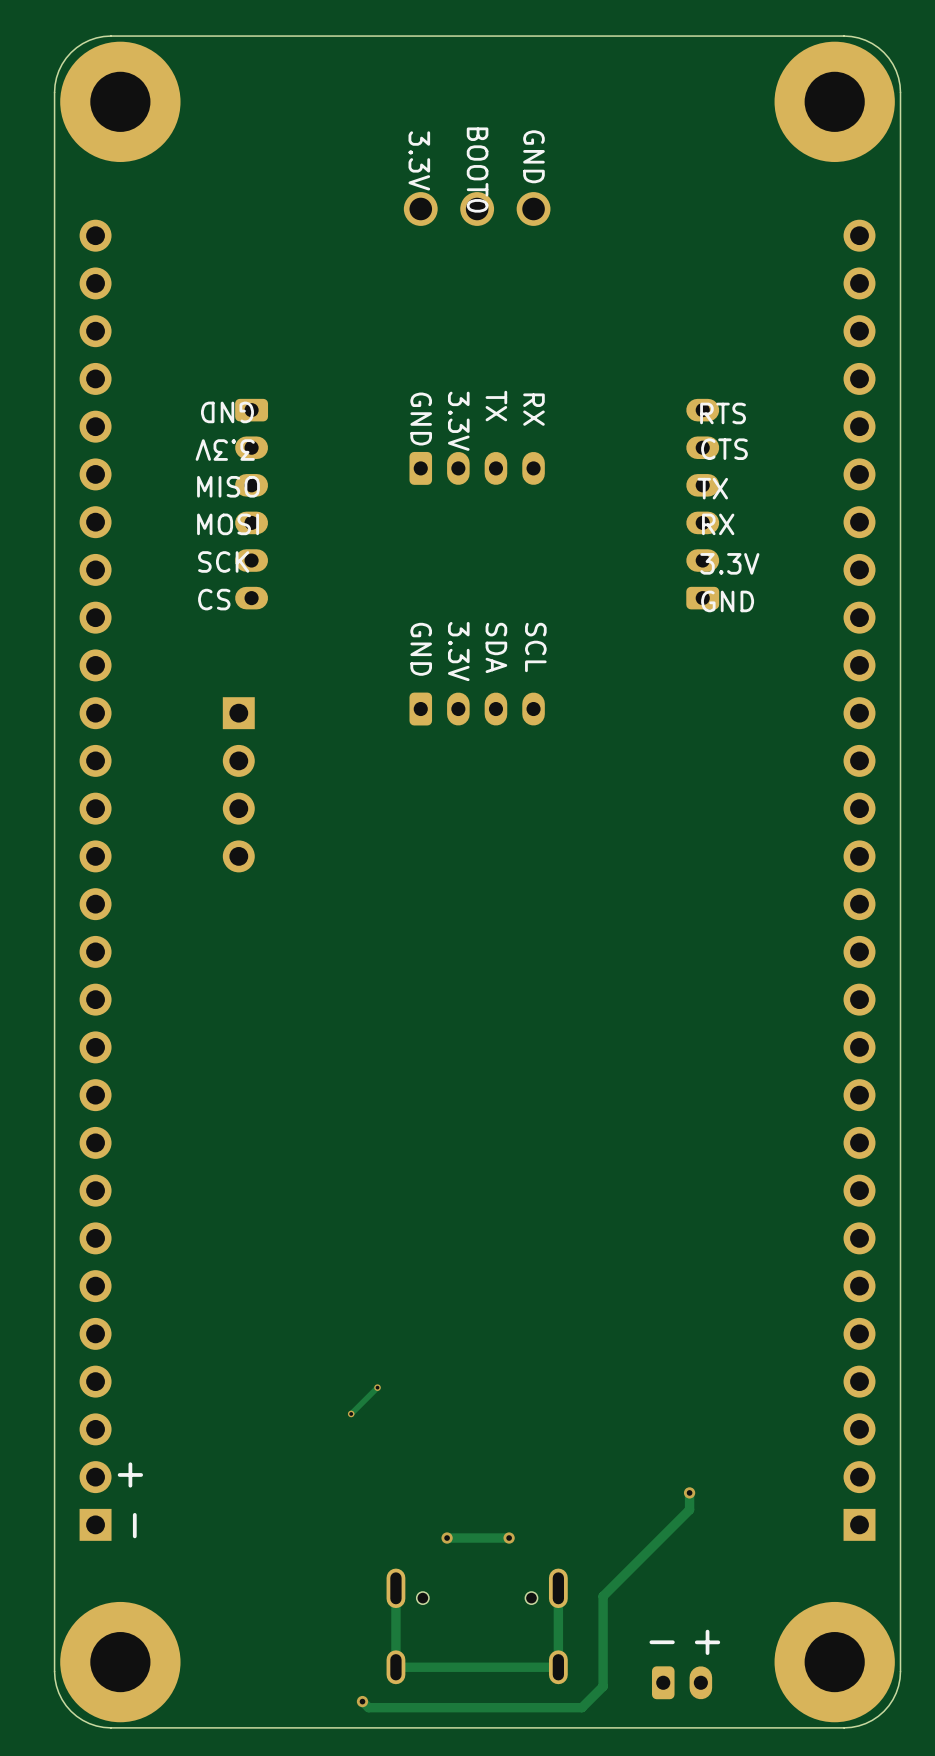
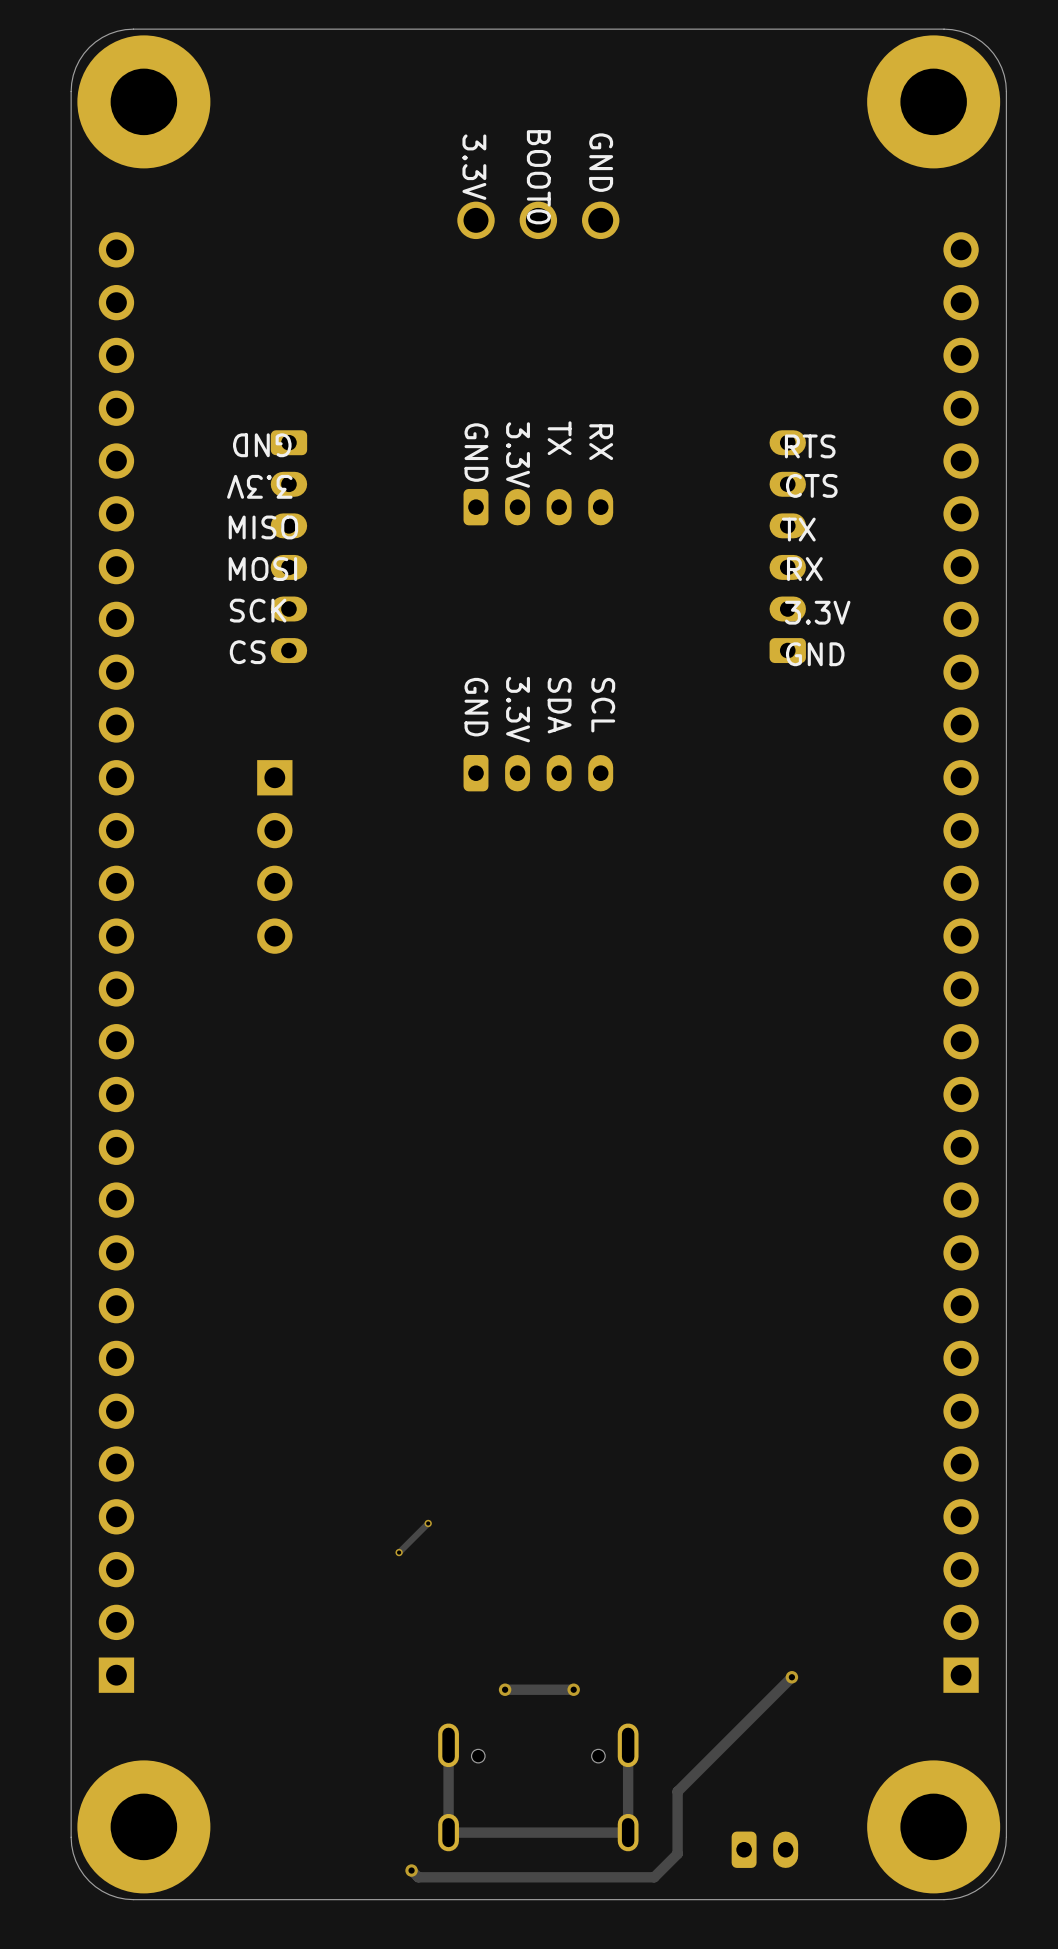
text: + (130, 1474) -> none
track: (689, 1492) (689, 1509) (603, 1596) (603, 1630) -> (791, 1677) (677, 1791)
via position: (689, 1492) -> (791, 1677)
text: - (134, 1525) -> none
text: - (662, 1642) -> none
text: + (707, 1642) -> none

